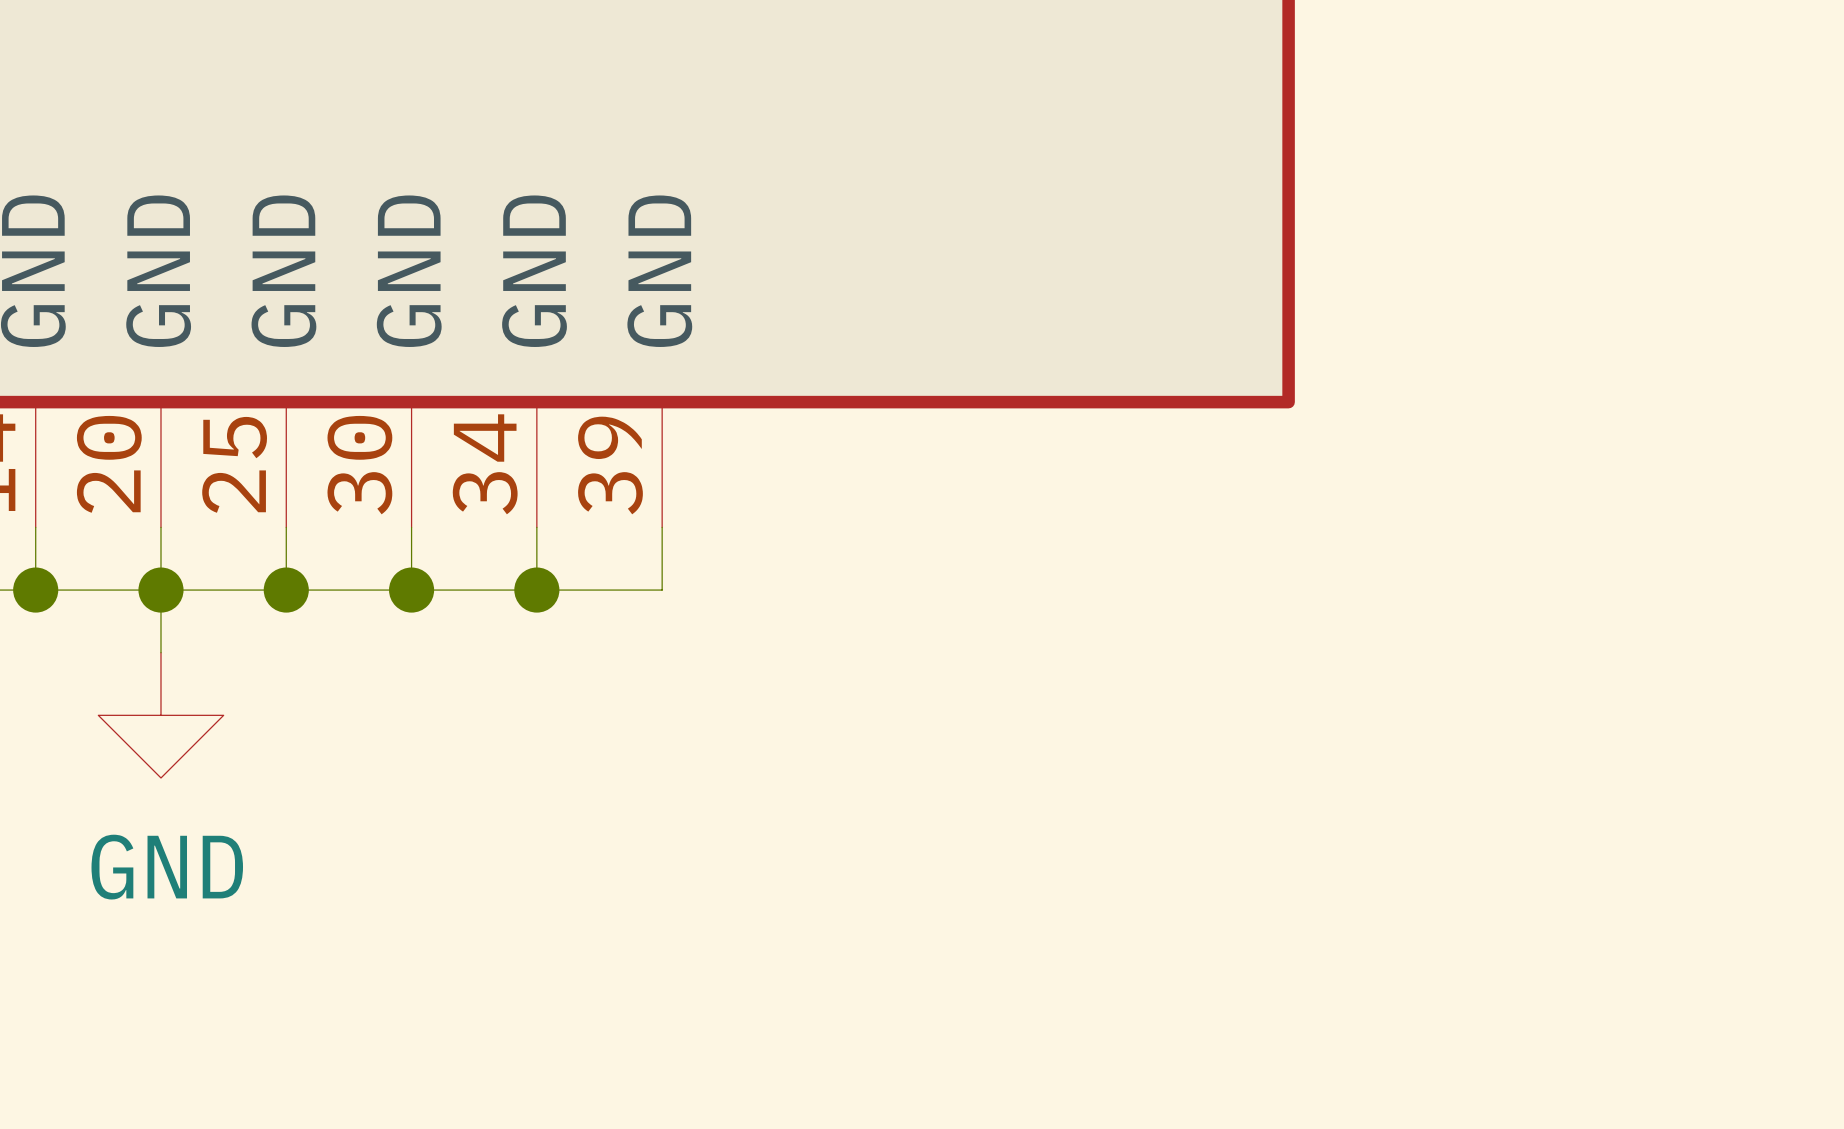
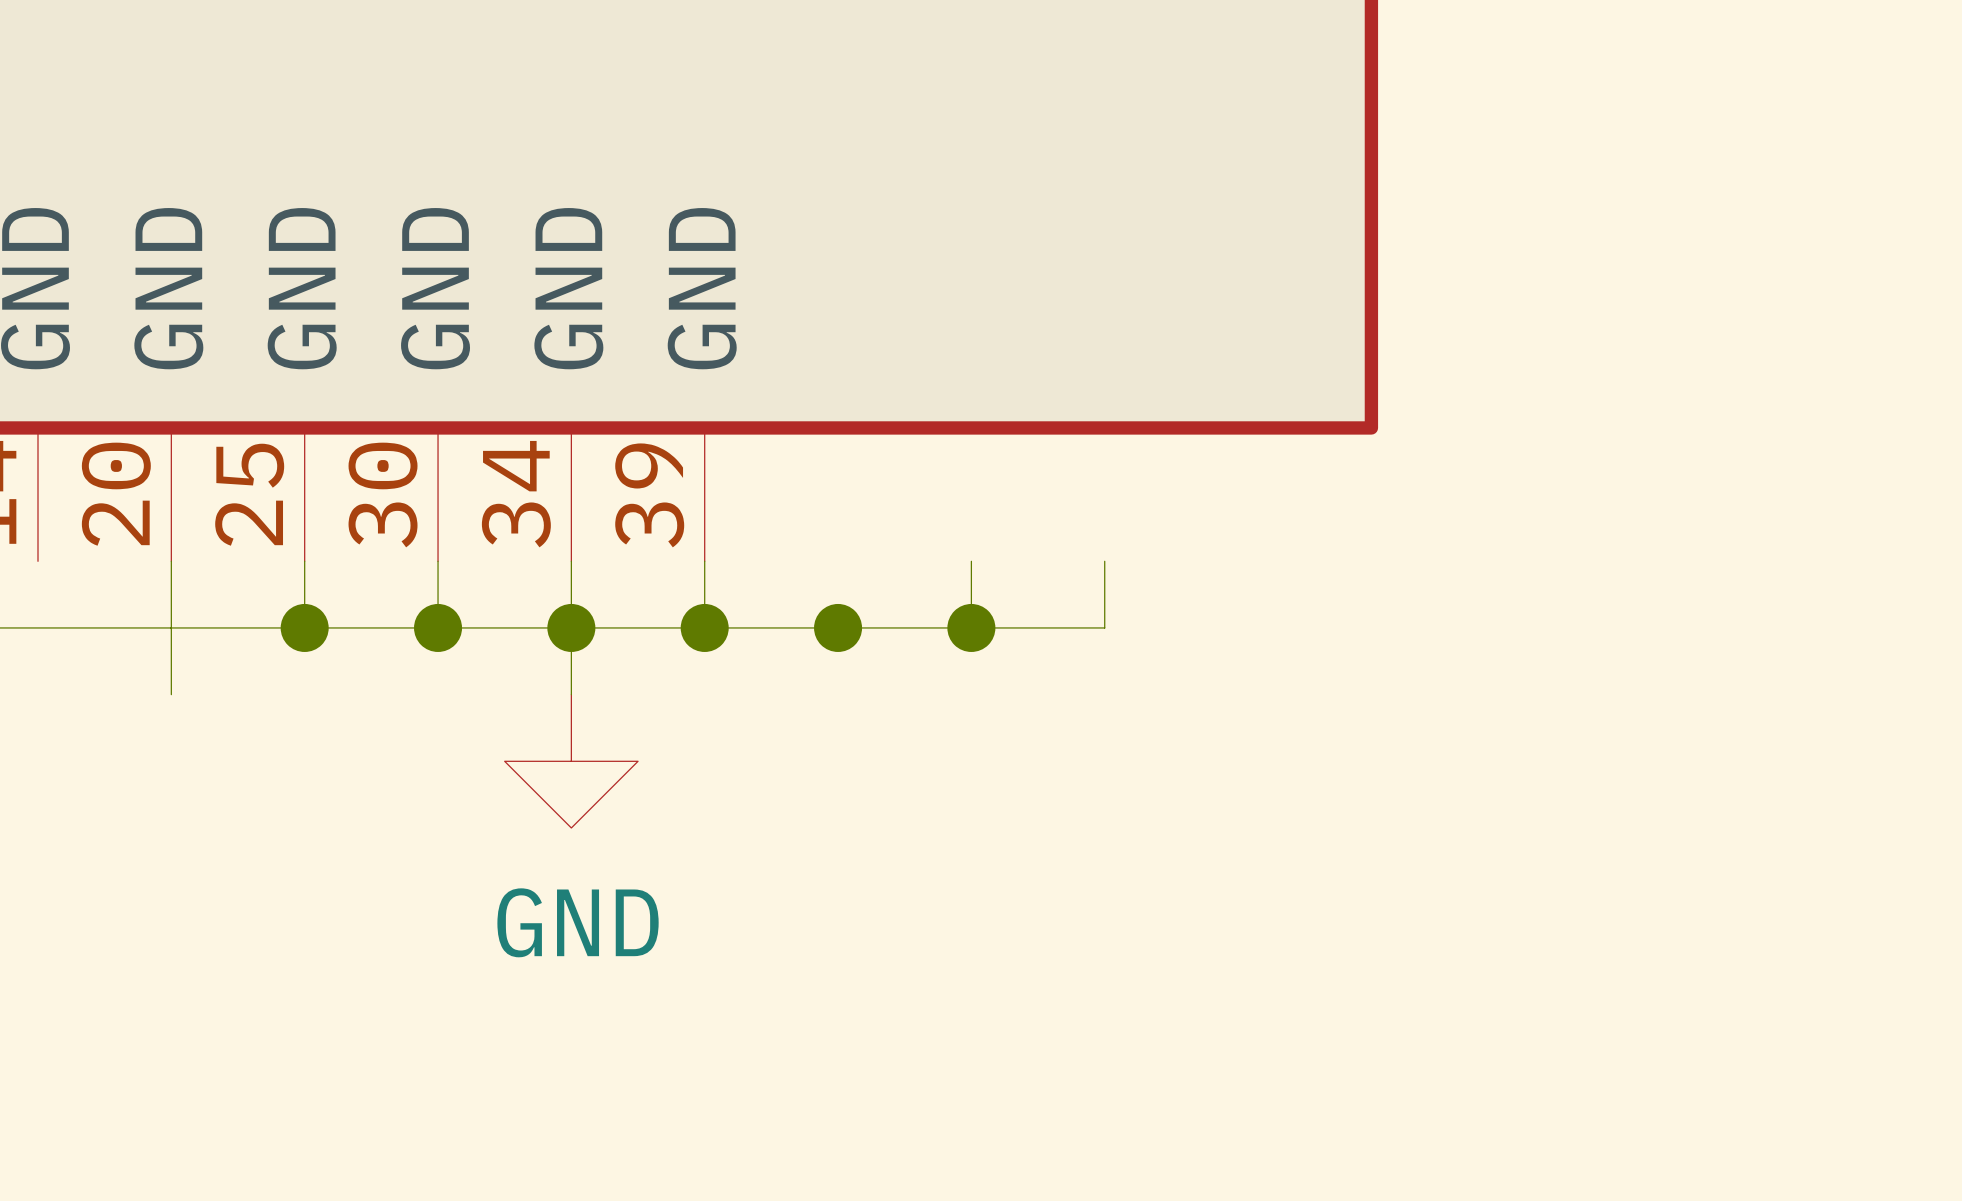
wire: (35, 527) (35, 590) -> (571, 627) (571, 694)
wire: none -> (971, 561) (971, 627)
wire: none -> (1104, 561) (1104, 627) (704, 627)
junction: (35, 590) -> none
junction: (160, 590) -> none
junction: none -> (704, 627)
junction: none -> (838, 627)
junction: none -> (971, 627)
power symbol position: GND (160, 715) -> GND (571, 761)

